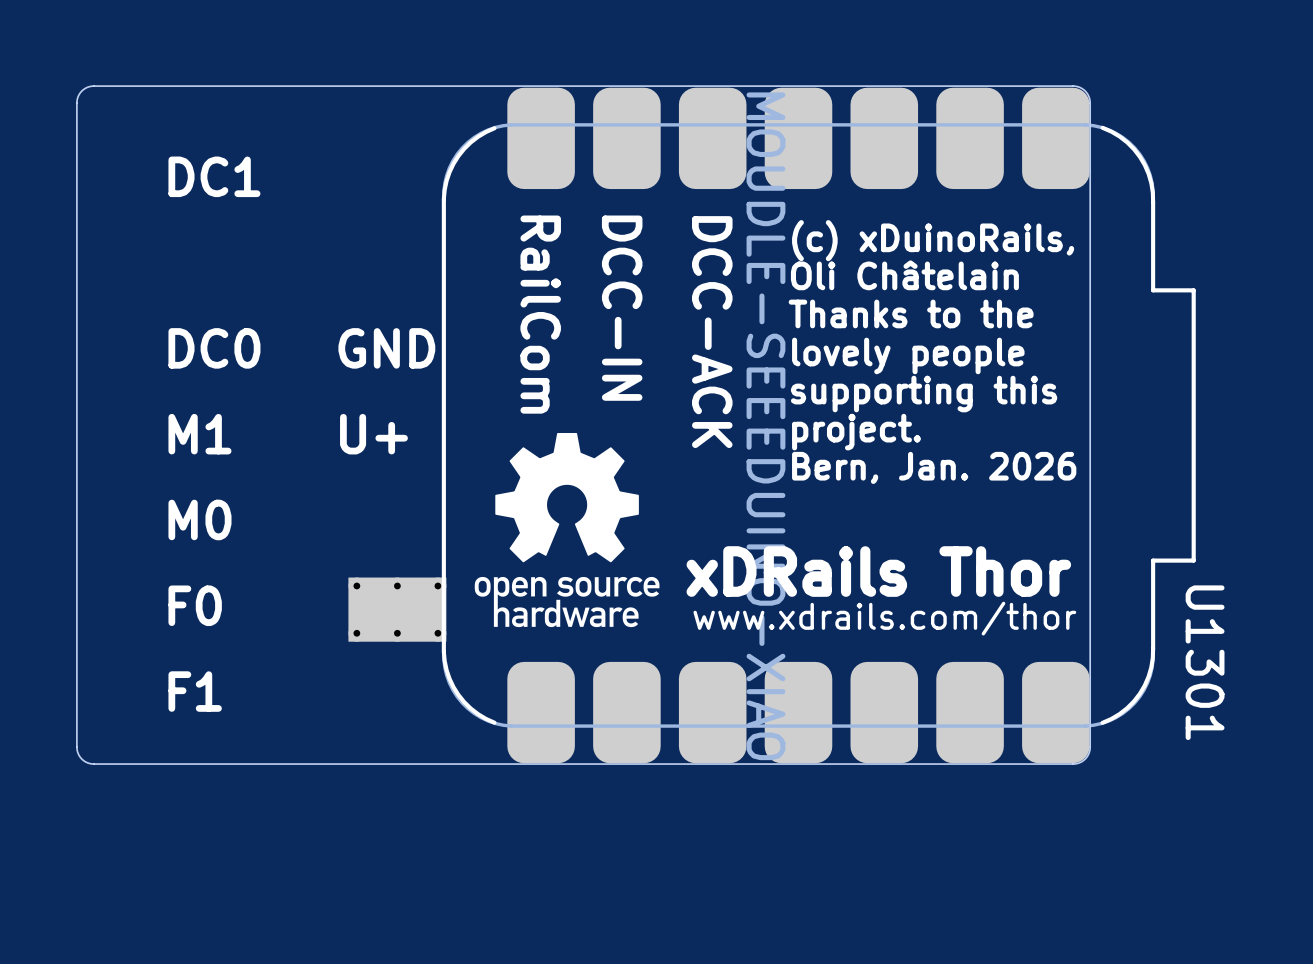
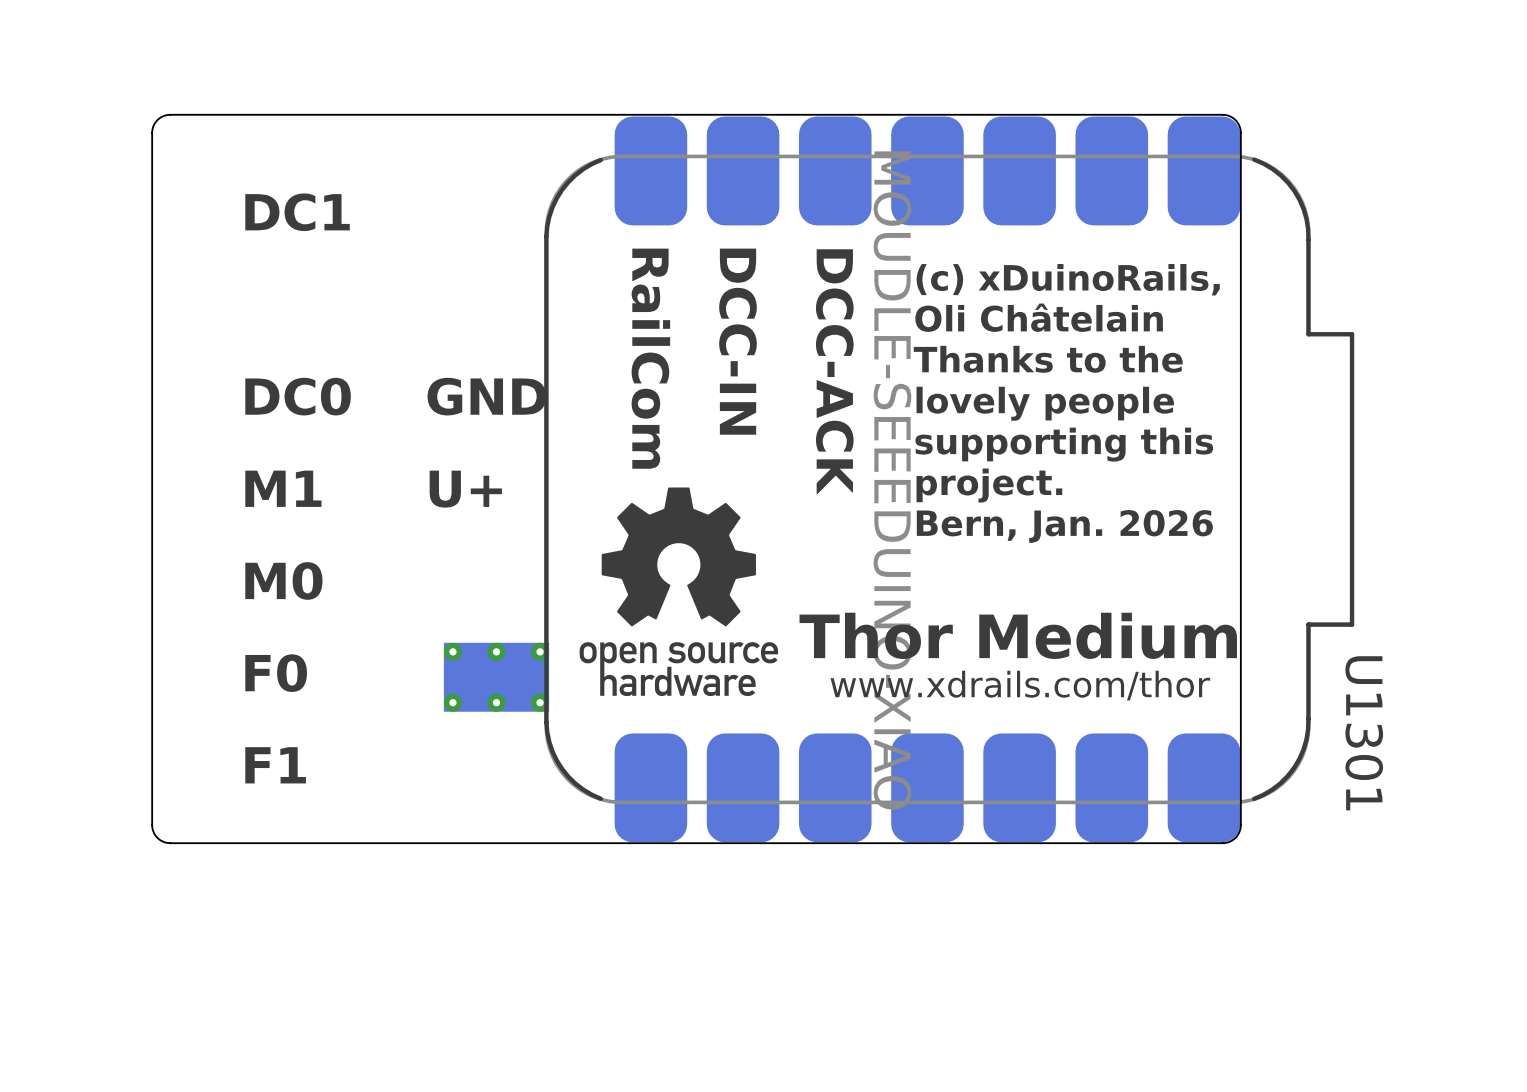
text: xDRails Thor (878, 571) -> Thor Medium (1018, 635)

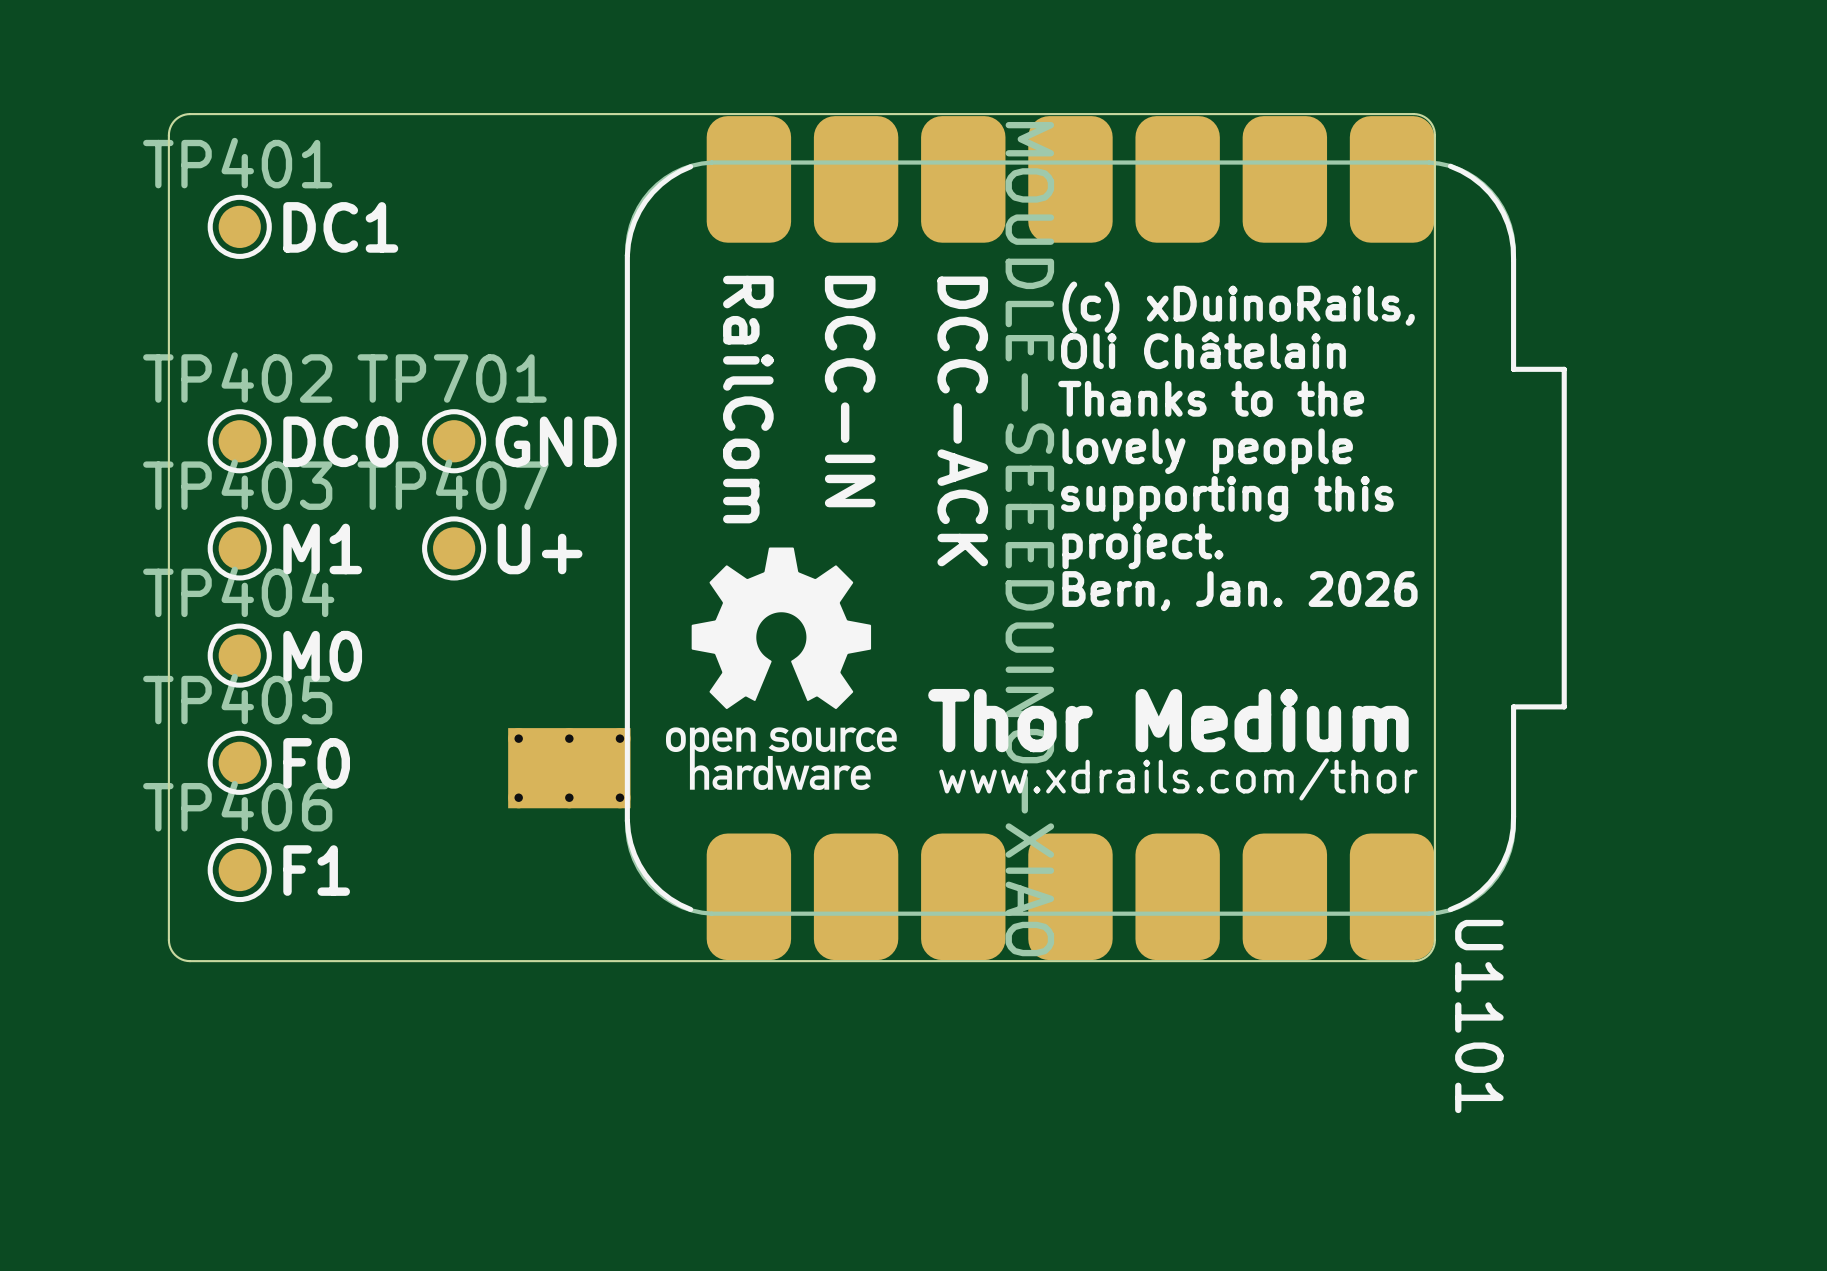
TP401: none -> (239, 226)
TP402: none -> (239, 441)
TP701: none -> (454, 441)
TP403: none -> (239, 548)
TP407: none -> (454, 548)
TP404: none -> (239, 655)
TP405: none -> (239, 762)
U1301 name: U1301 (1364, 733) -> U1101 (1479, 1016)
TP406: none -> (239, 870)

